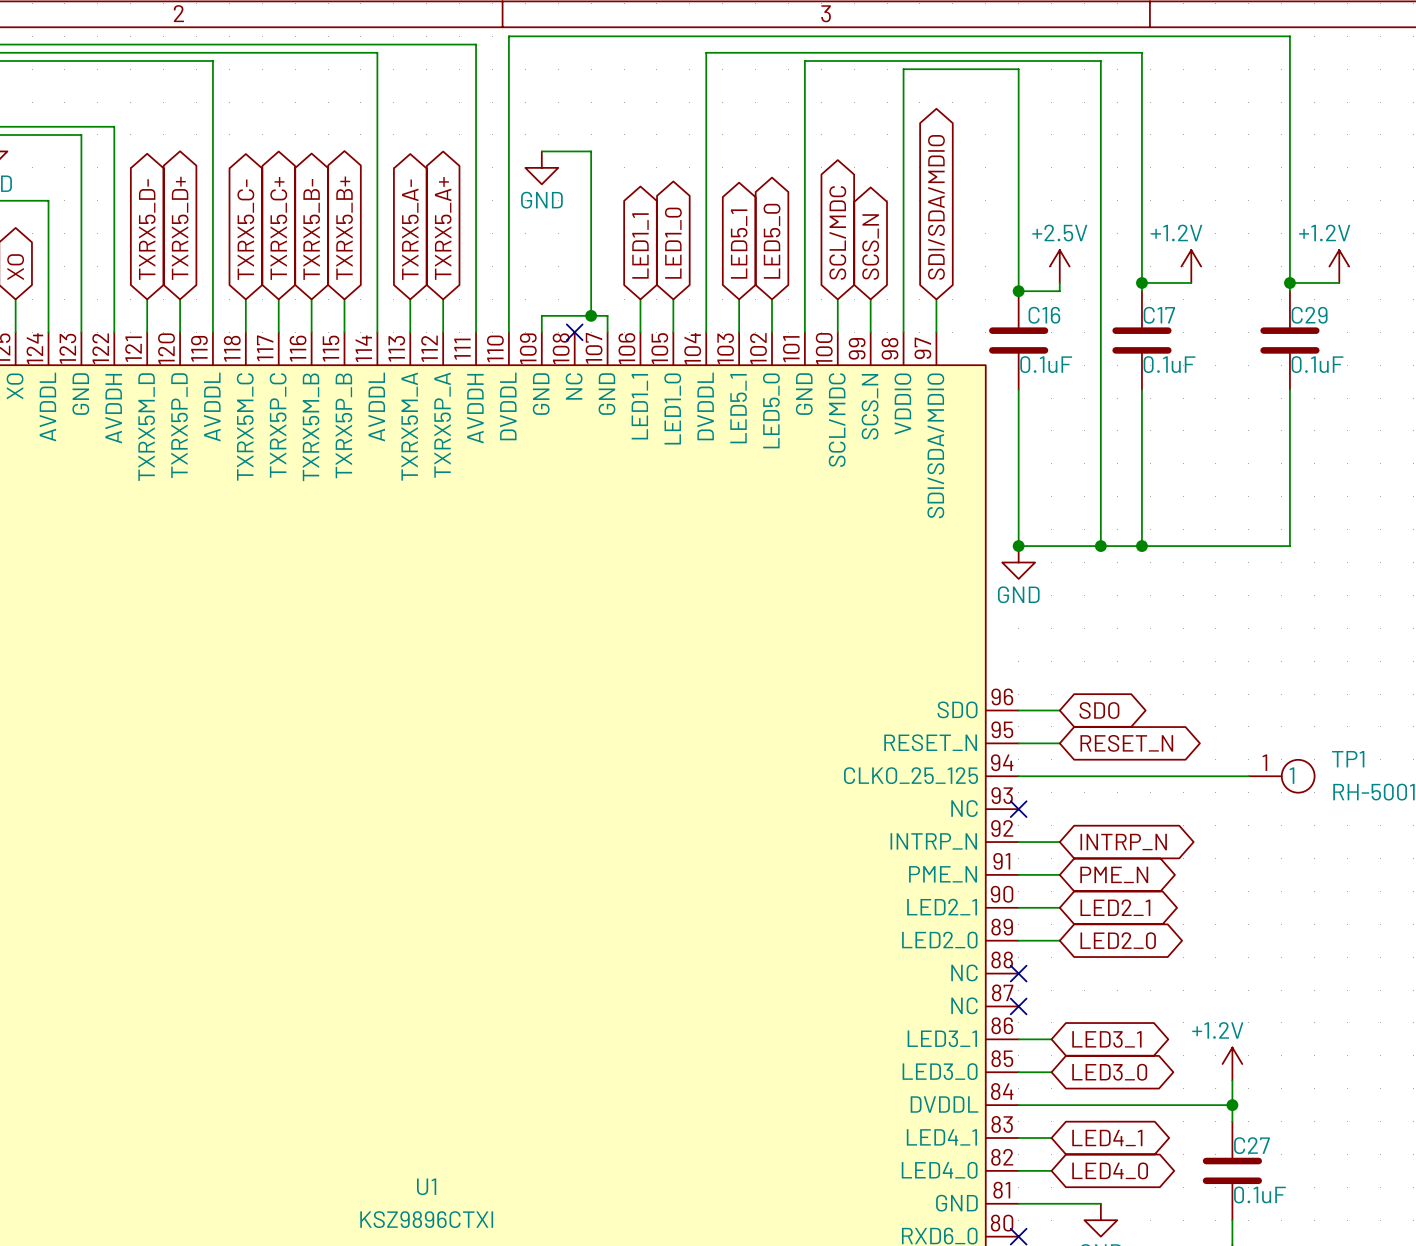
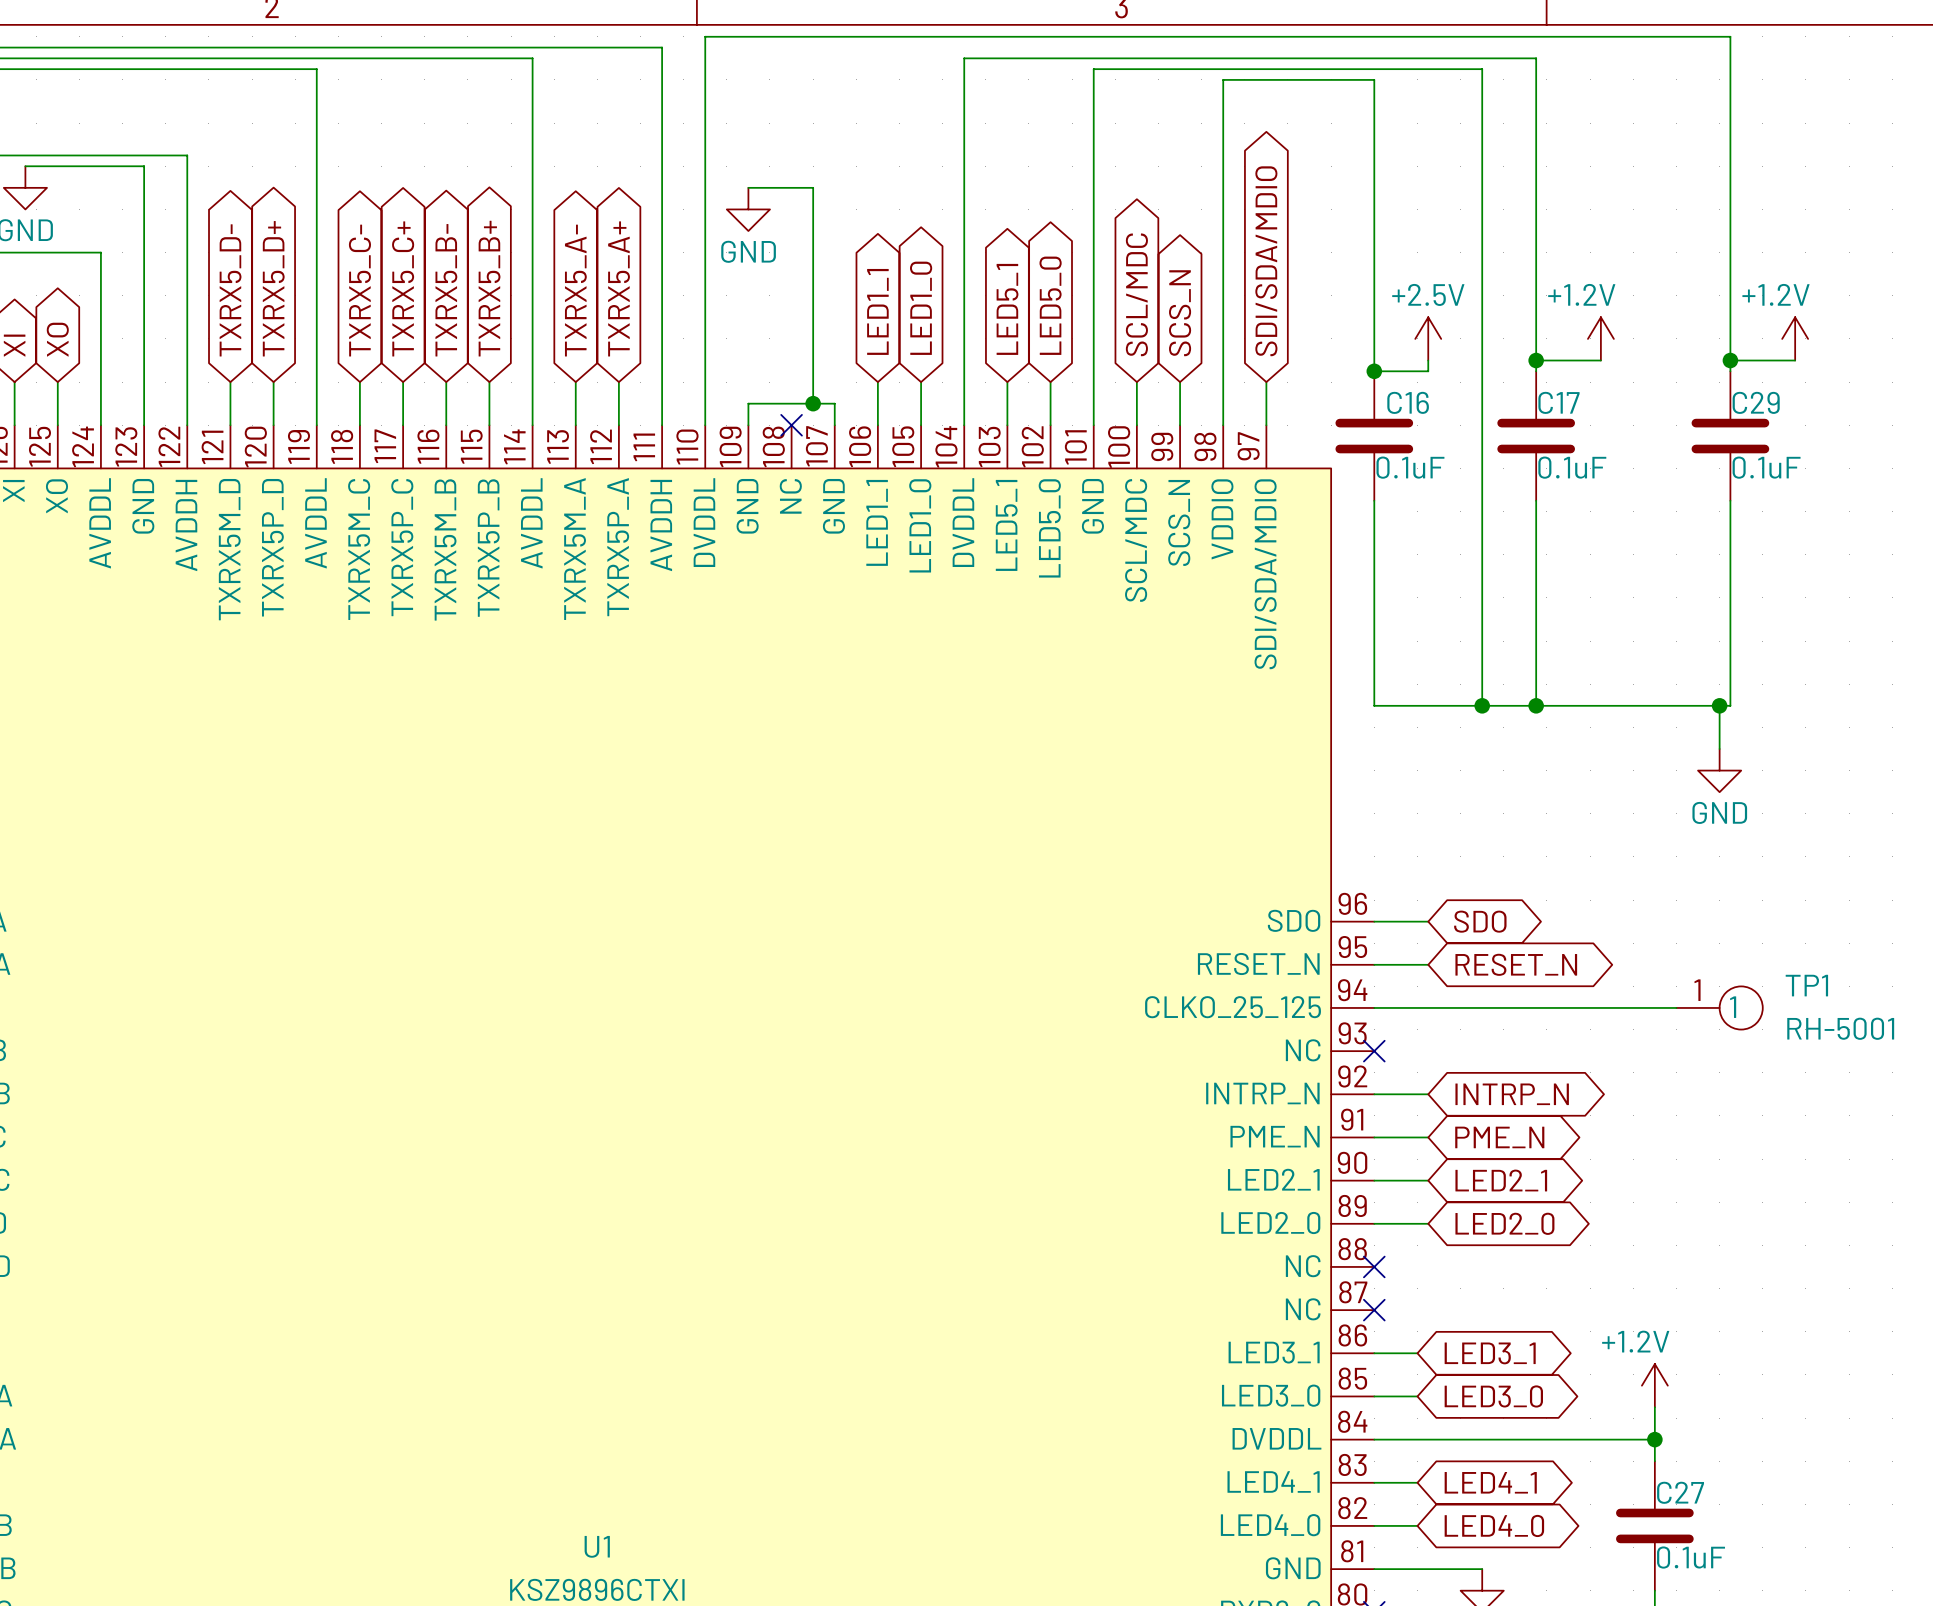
junction: (1018, 546) -> none
wire: none -> (1719, 705) (1719, 748)
junction: none -> (1719, 705)
power symbol position: GND (1018, 562) -> GND (1719, 770)

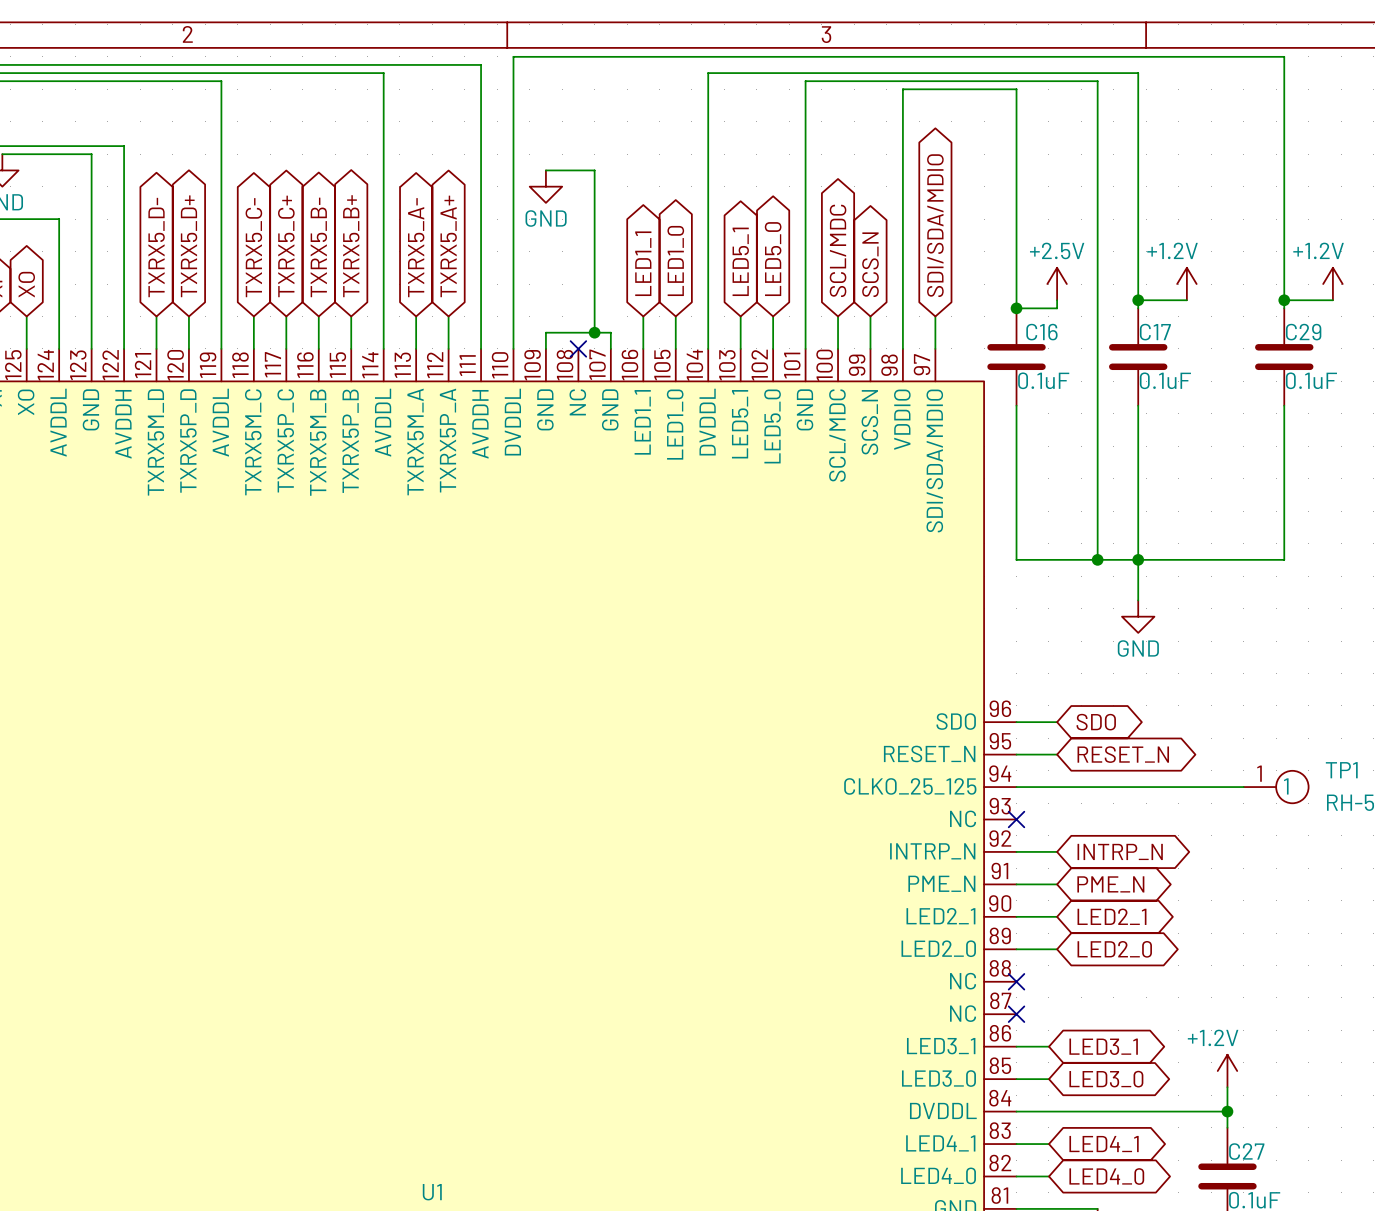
wire: none -> (1138, 559) (1138, 600)
wire: (1719, 705) (1719, 748) -> none
junction: (1719, 705) -> none
power symbol position: GND (1719, 770) -> GND (1138, 616)

